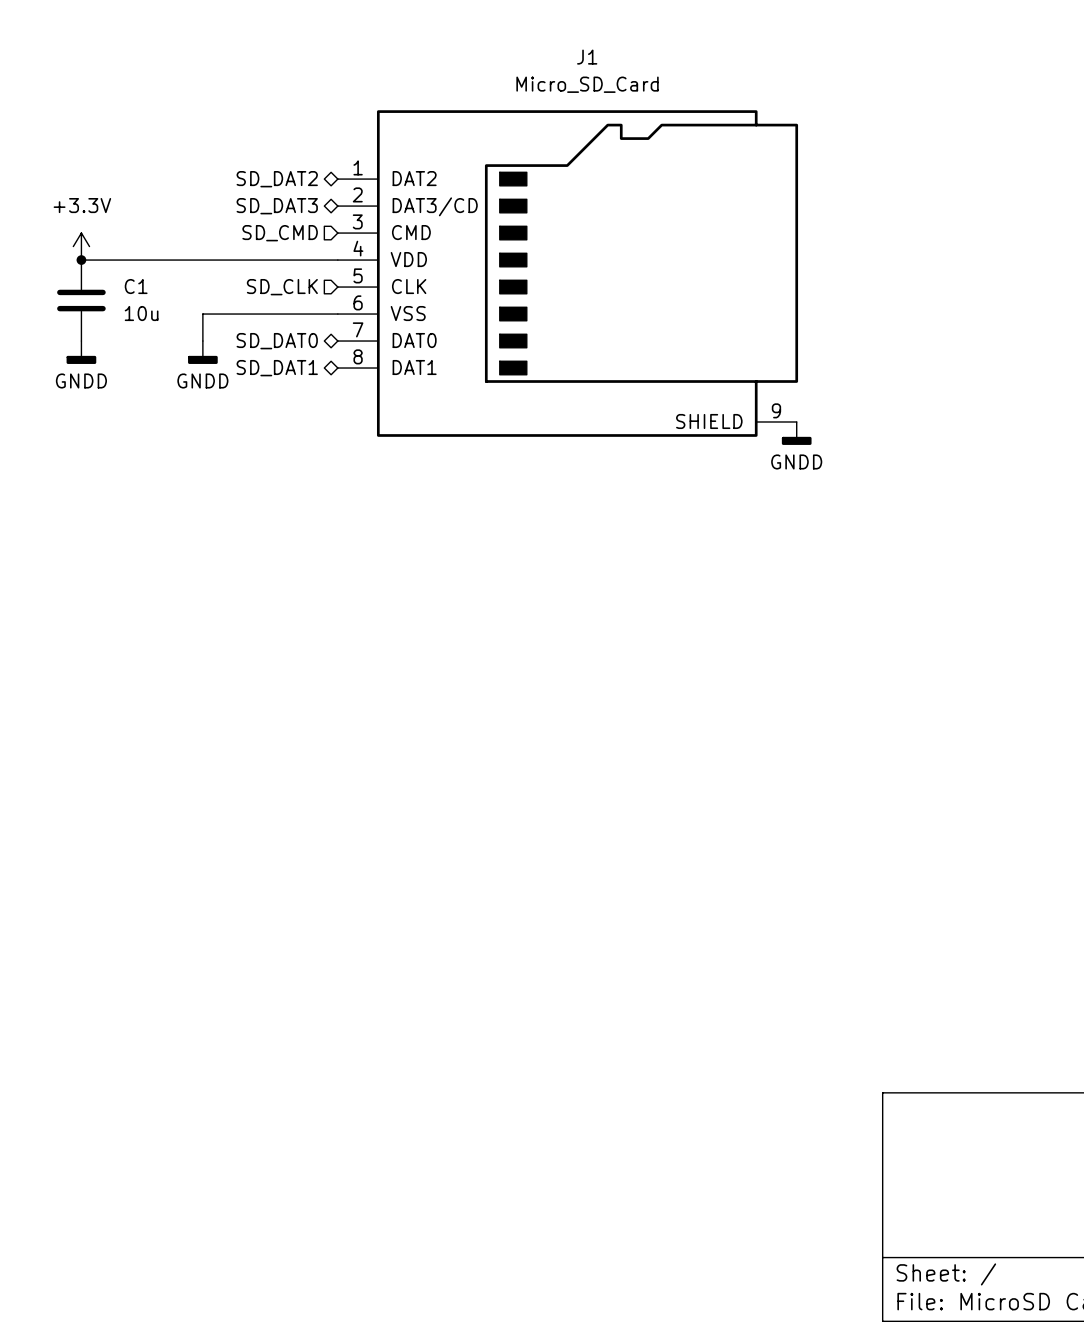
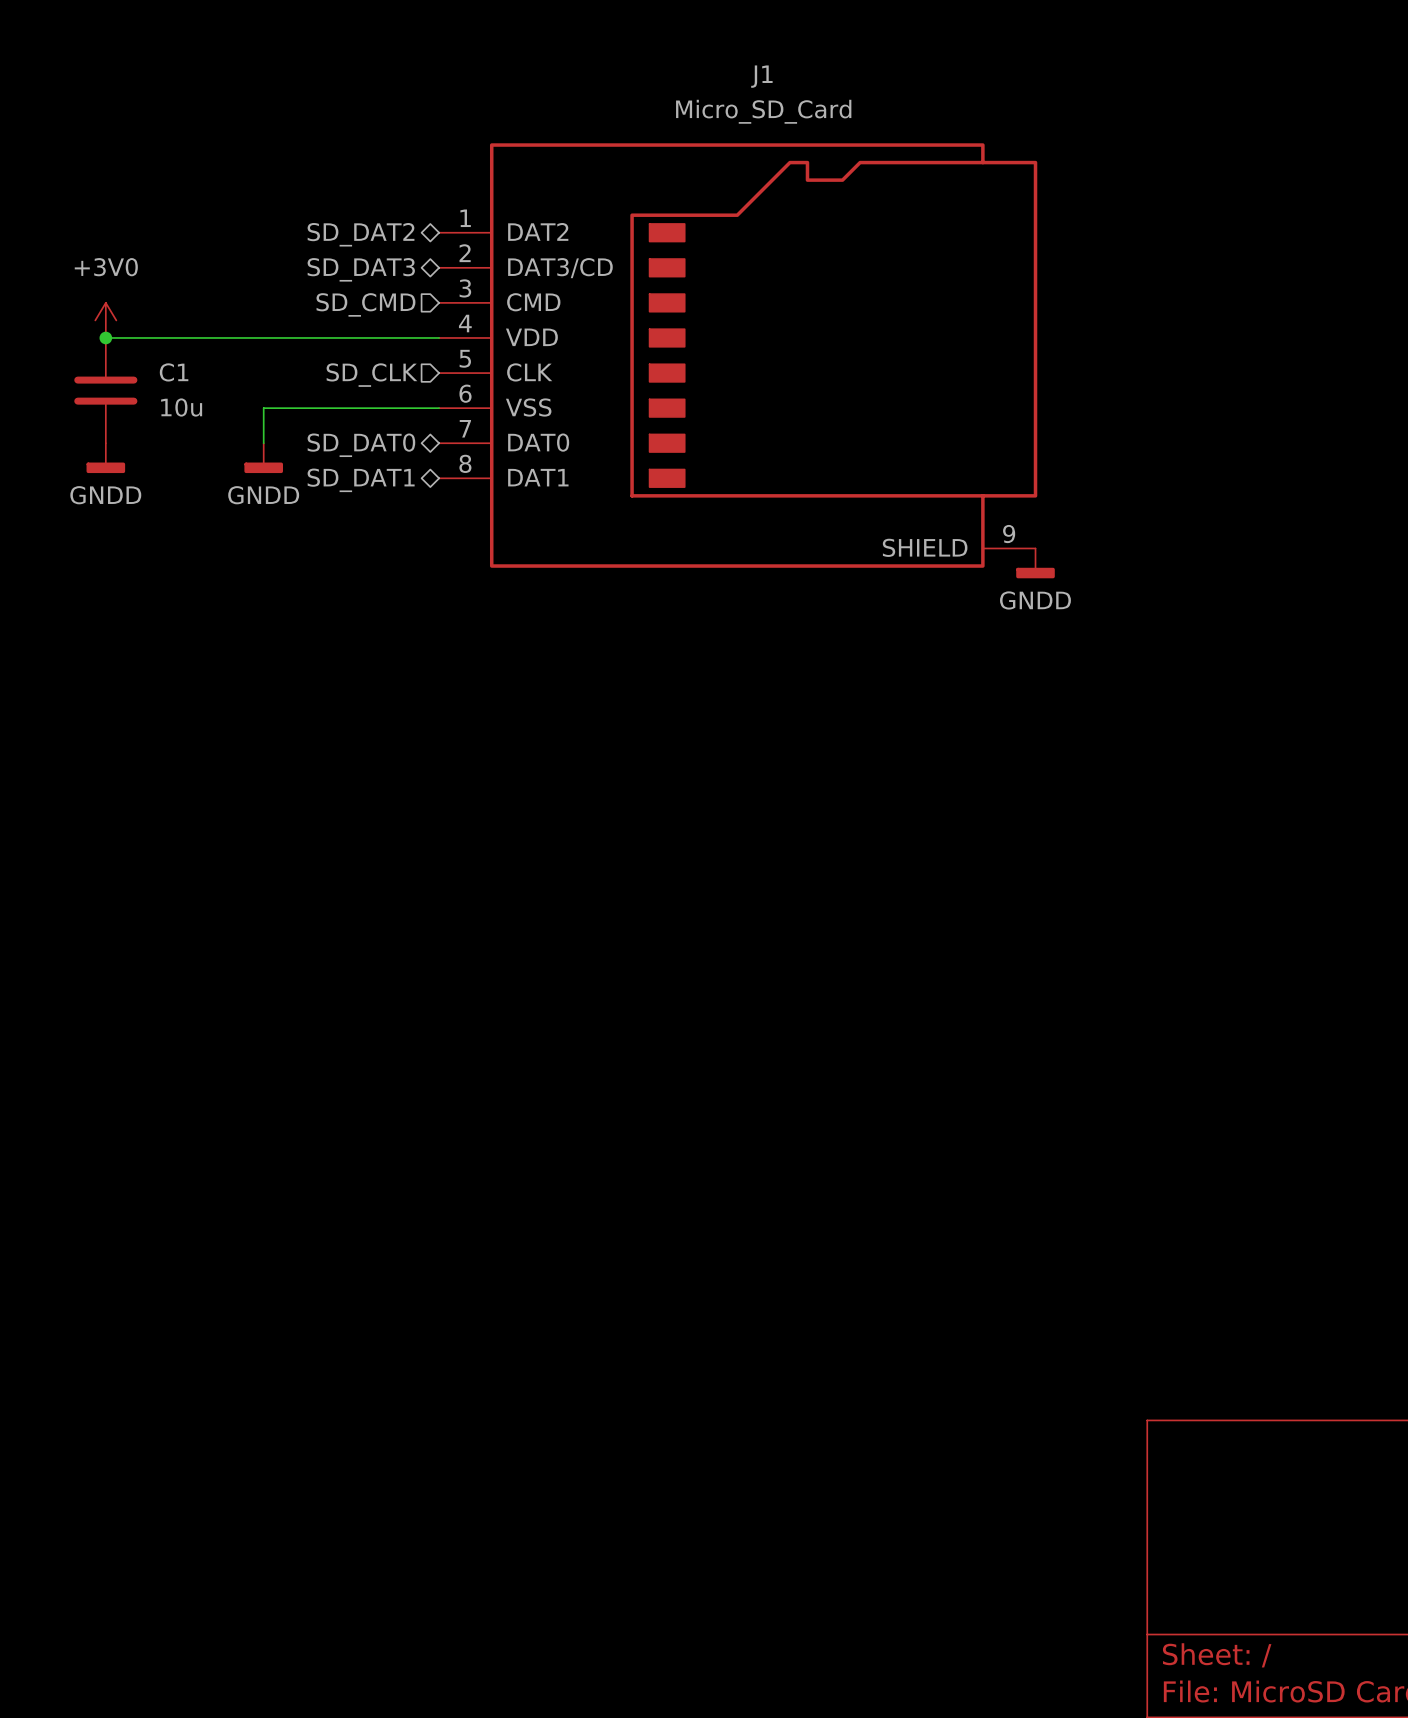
power symbol: +3.3V (81, 246) -> +3V0 (105, 320)

